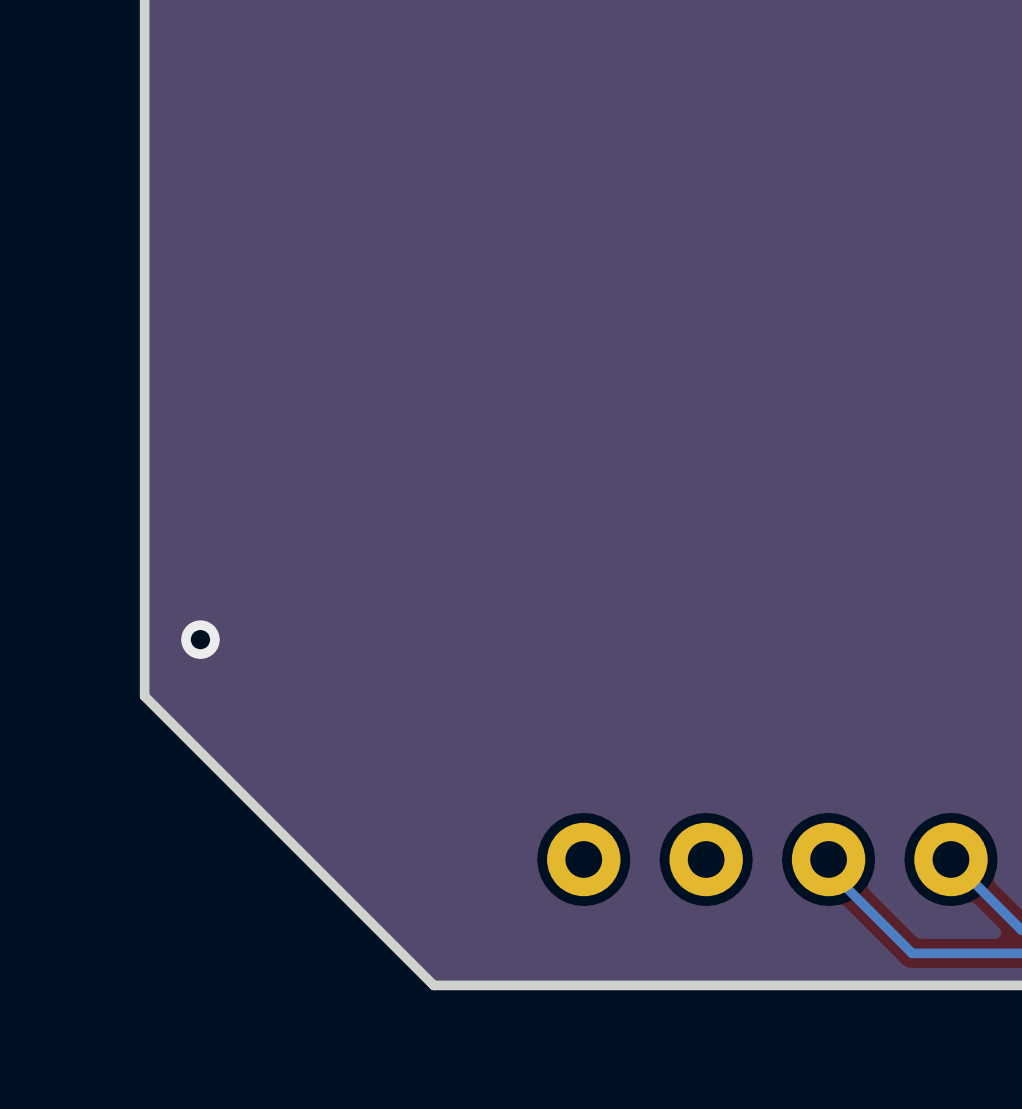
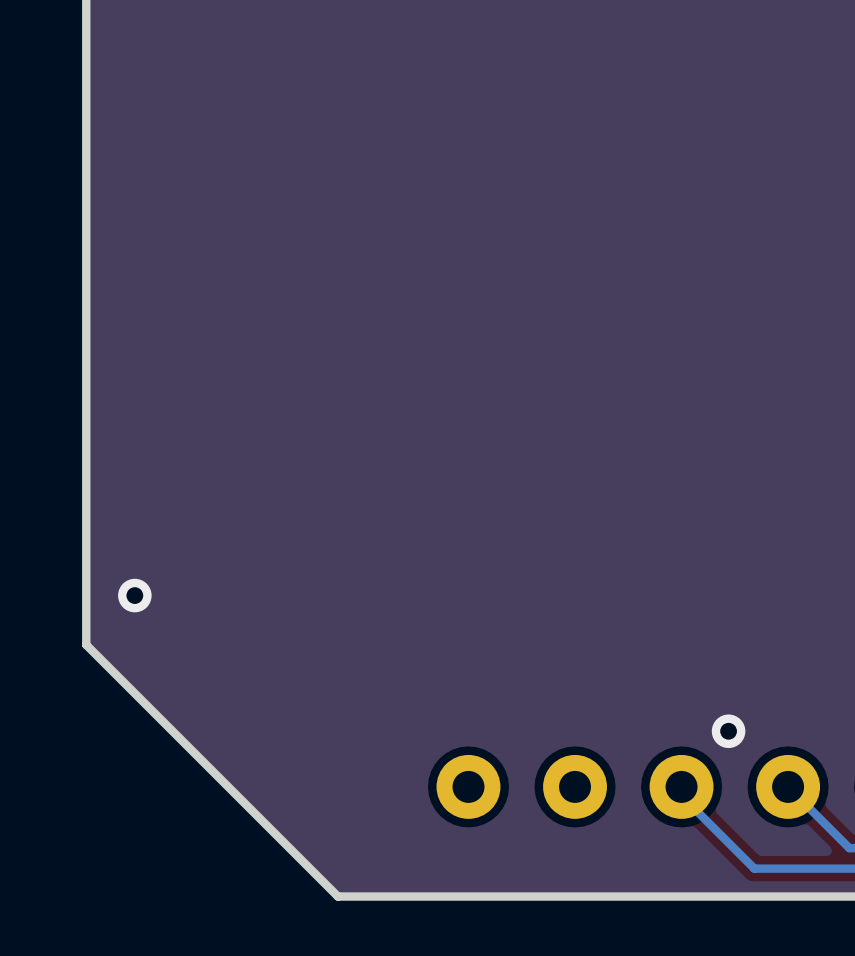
via: none -> (728, 731)

